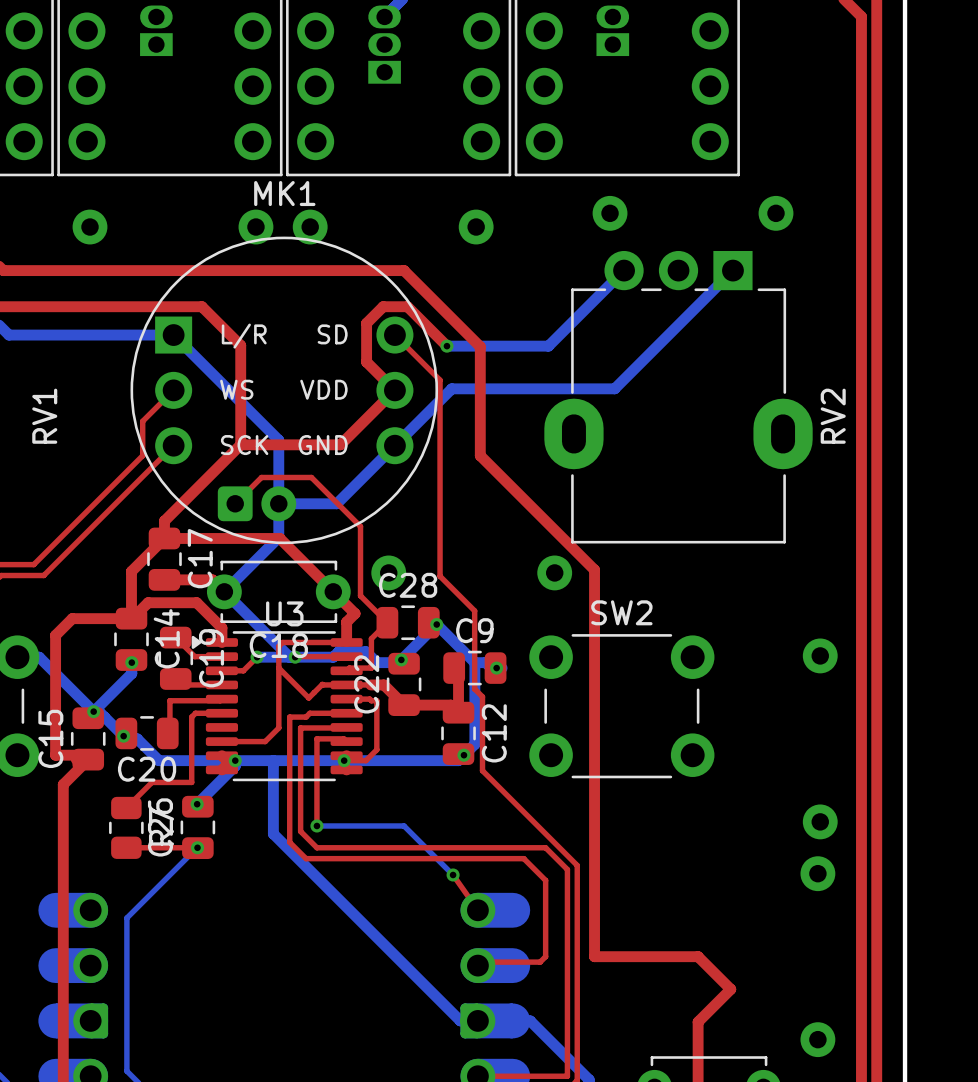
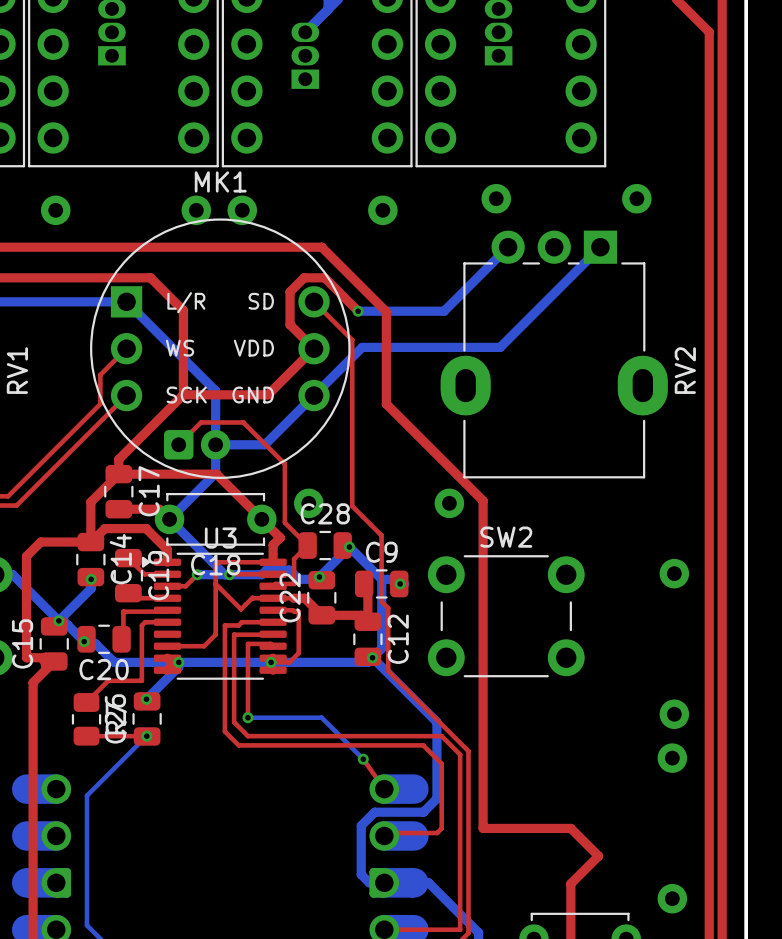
bottom track: (273, 760) (273, 833) (450, 1011) -> (372, 657) (436, 722) (436, 798) (423, 812) (374, 812) (361, 825) (361, 874)

